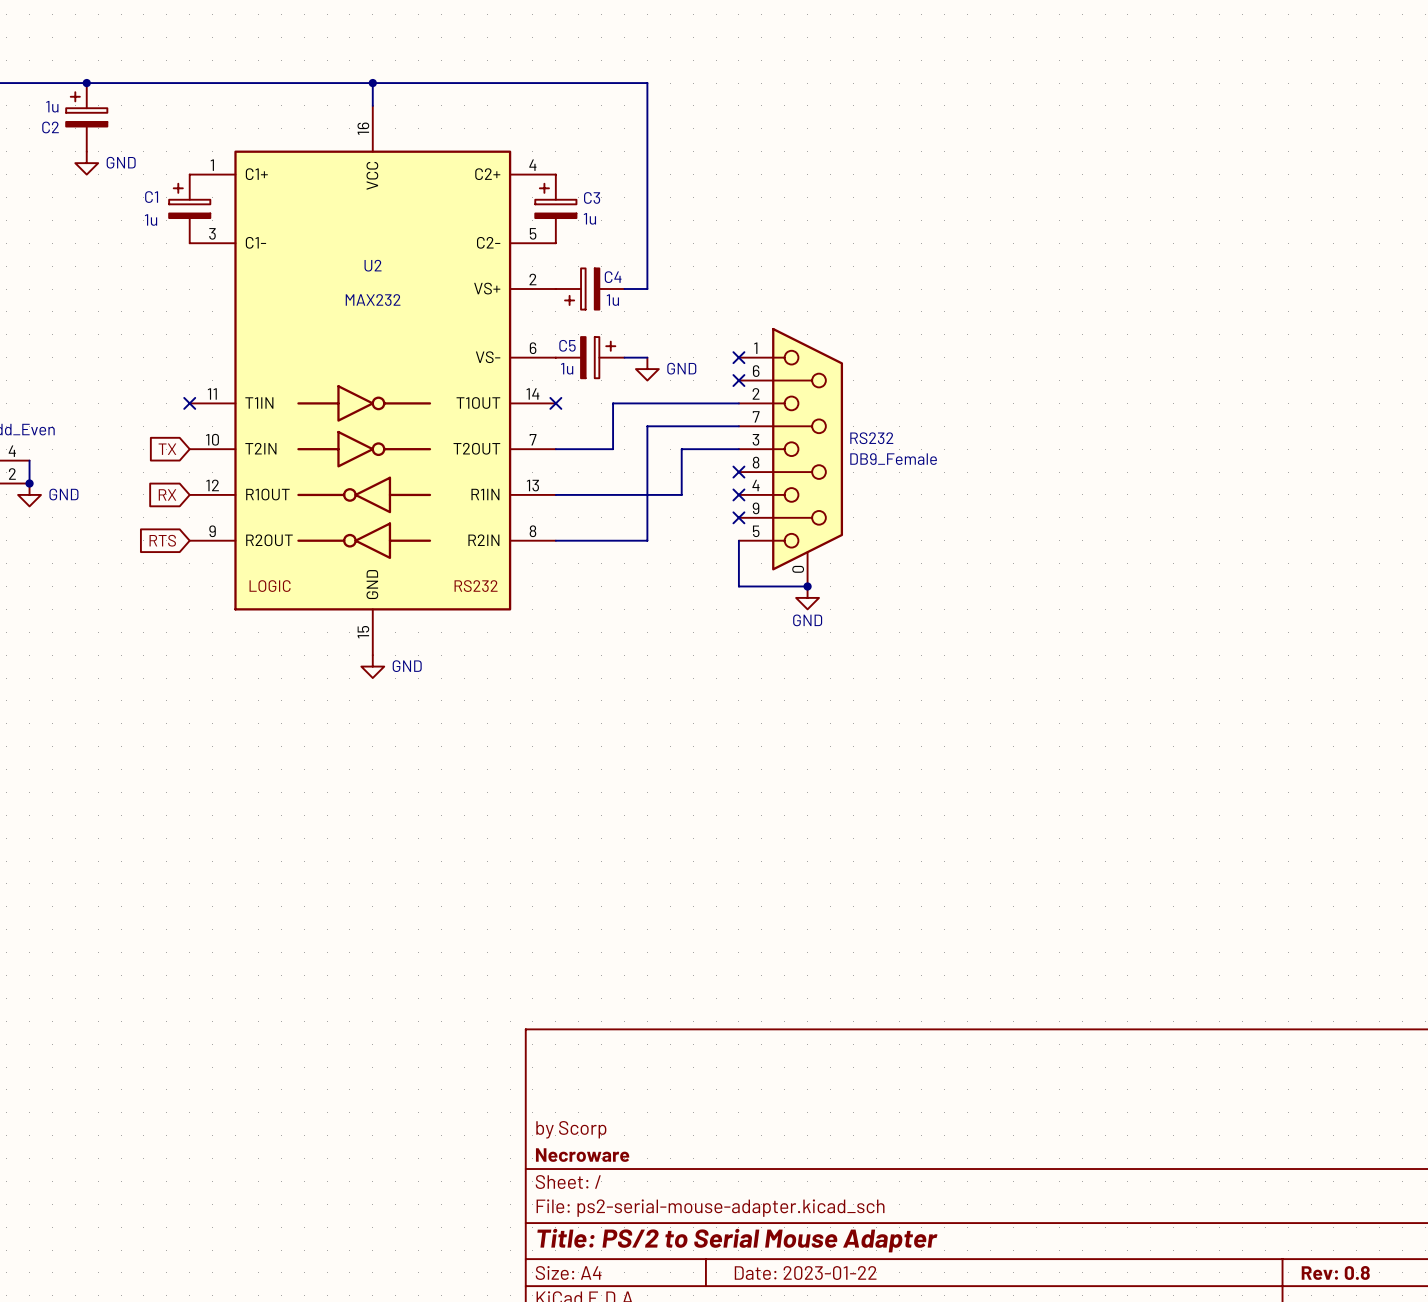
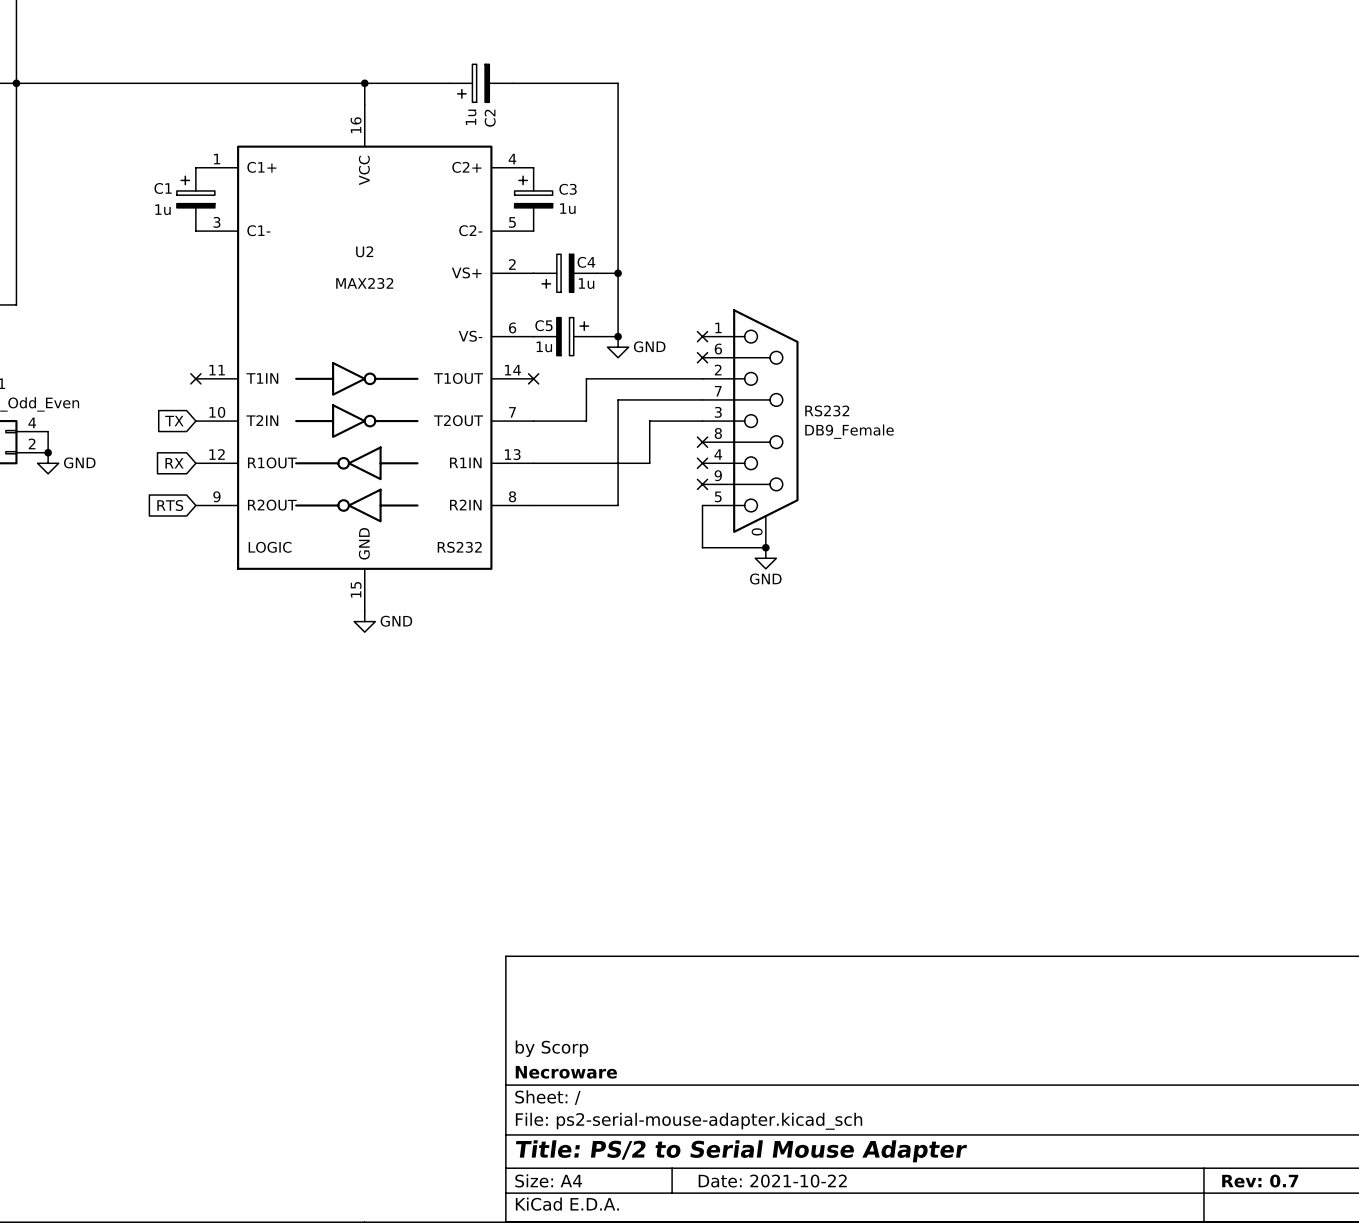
junction: (86, 83) -> none
C2 rotation: 0° (86, 109) -> 90° counterclockwise (473, 83)
C2 position: (86, 117) -> (480, 83)
power symbol: GND (86, 163) -> none
wire: none -> (618, 273) (618, 336)
junction: none -> (618, 273)
junction: none -> (618, 336)
title block: Rev: 0.8 (1335, 1272) -> Rev: 0.7 (1260, 1181)
title block: Date: 2023-01-22 (805, 1273) -> Date: 2021-10-22 (772, 1181)

